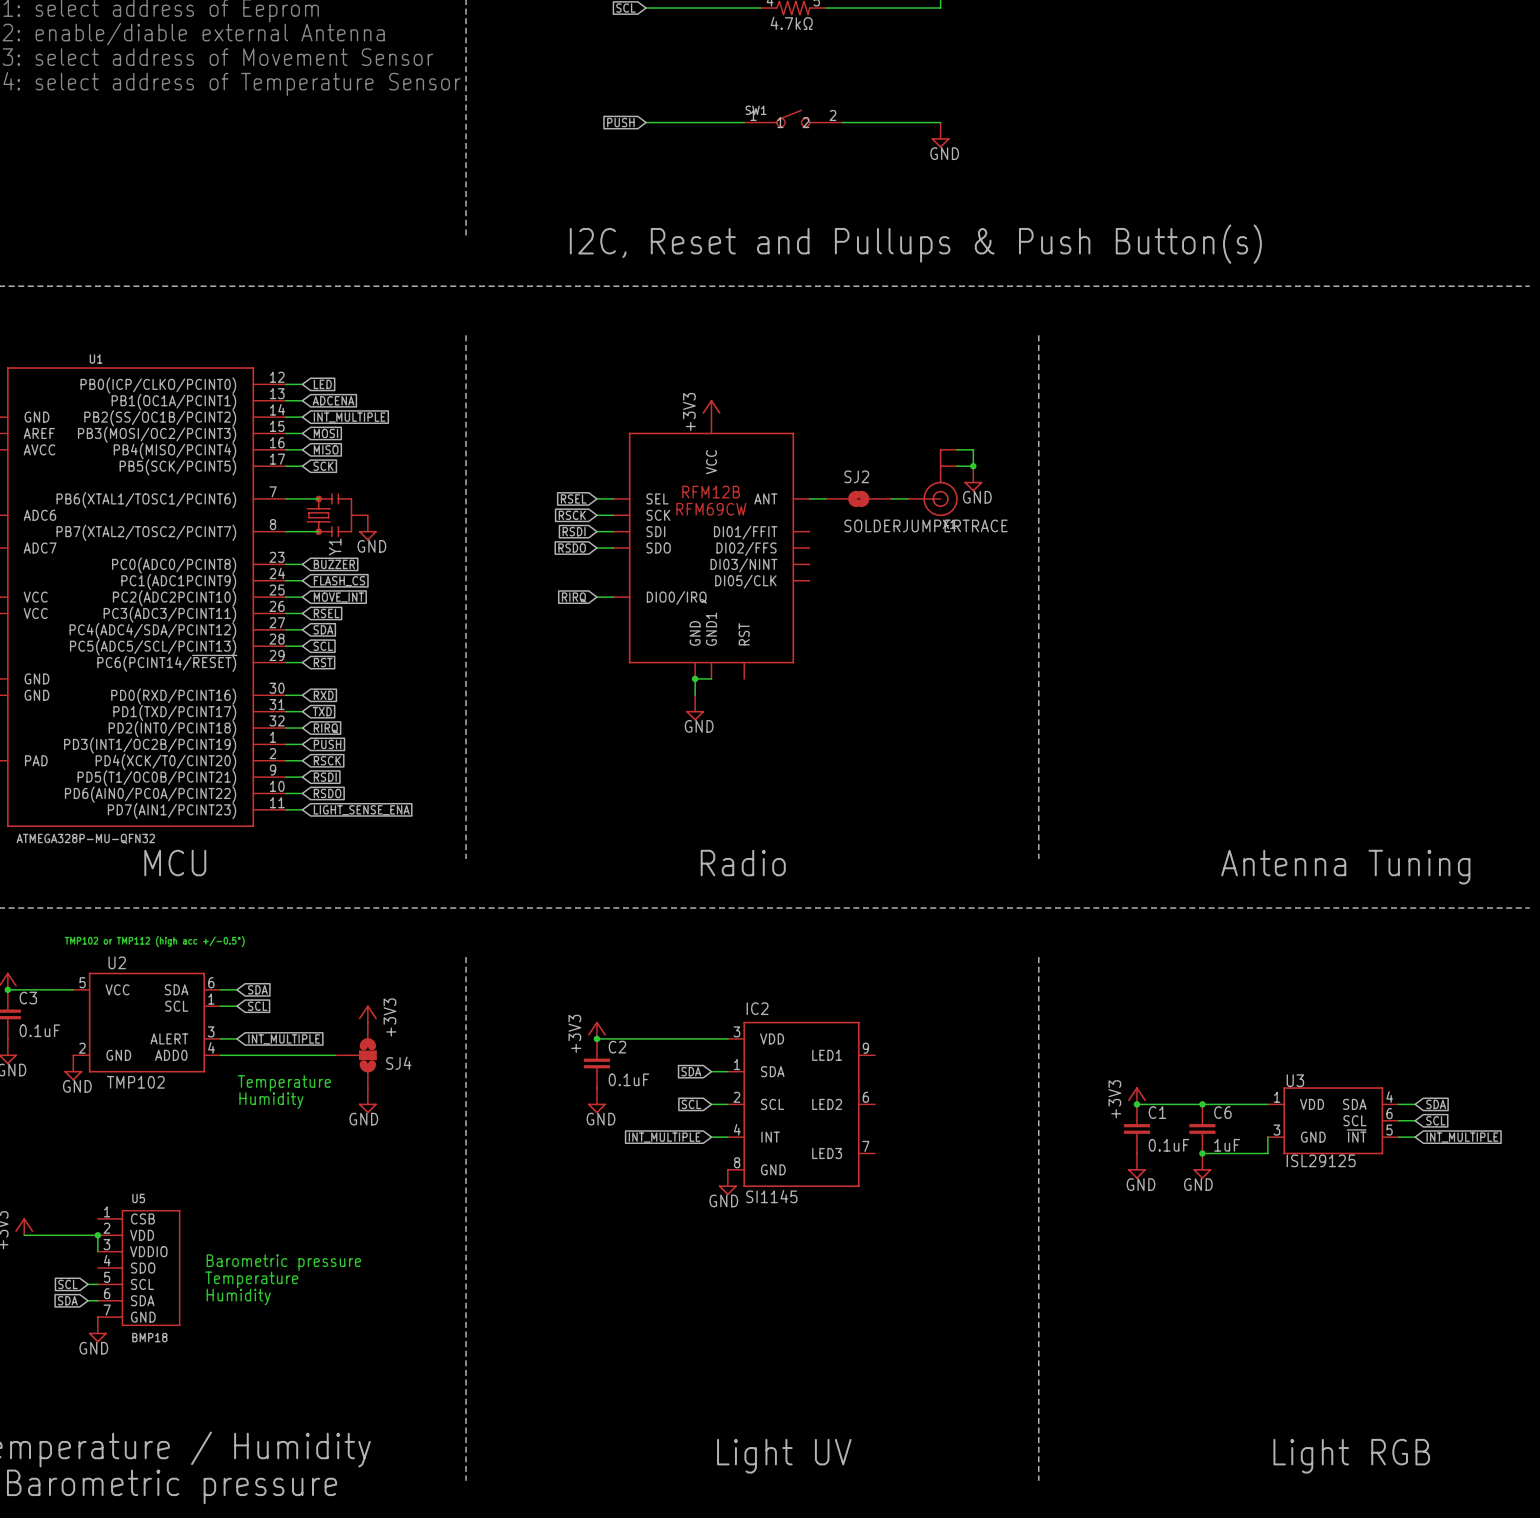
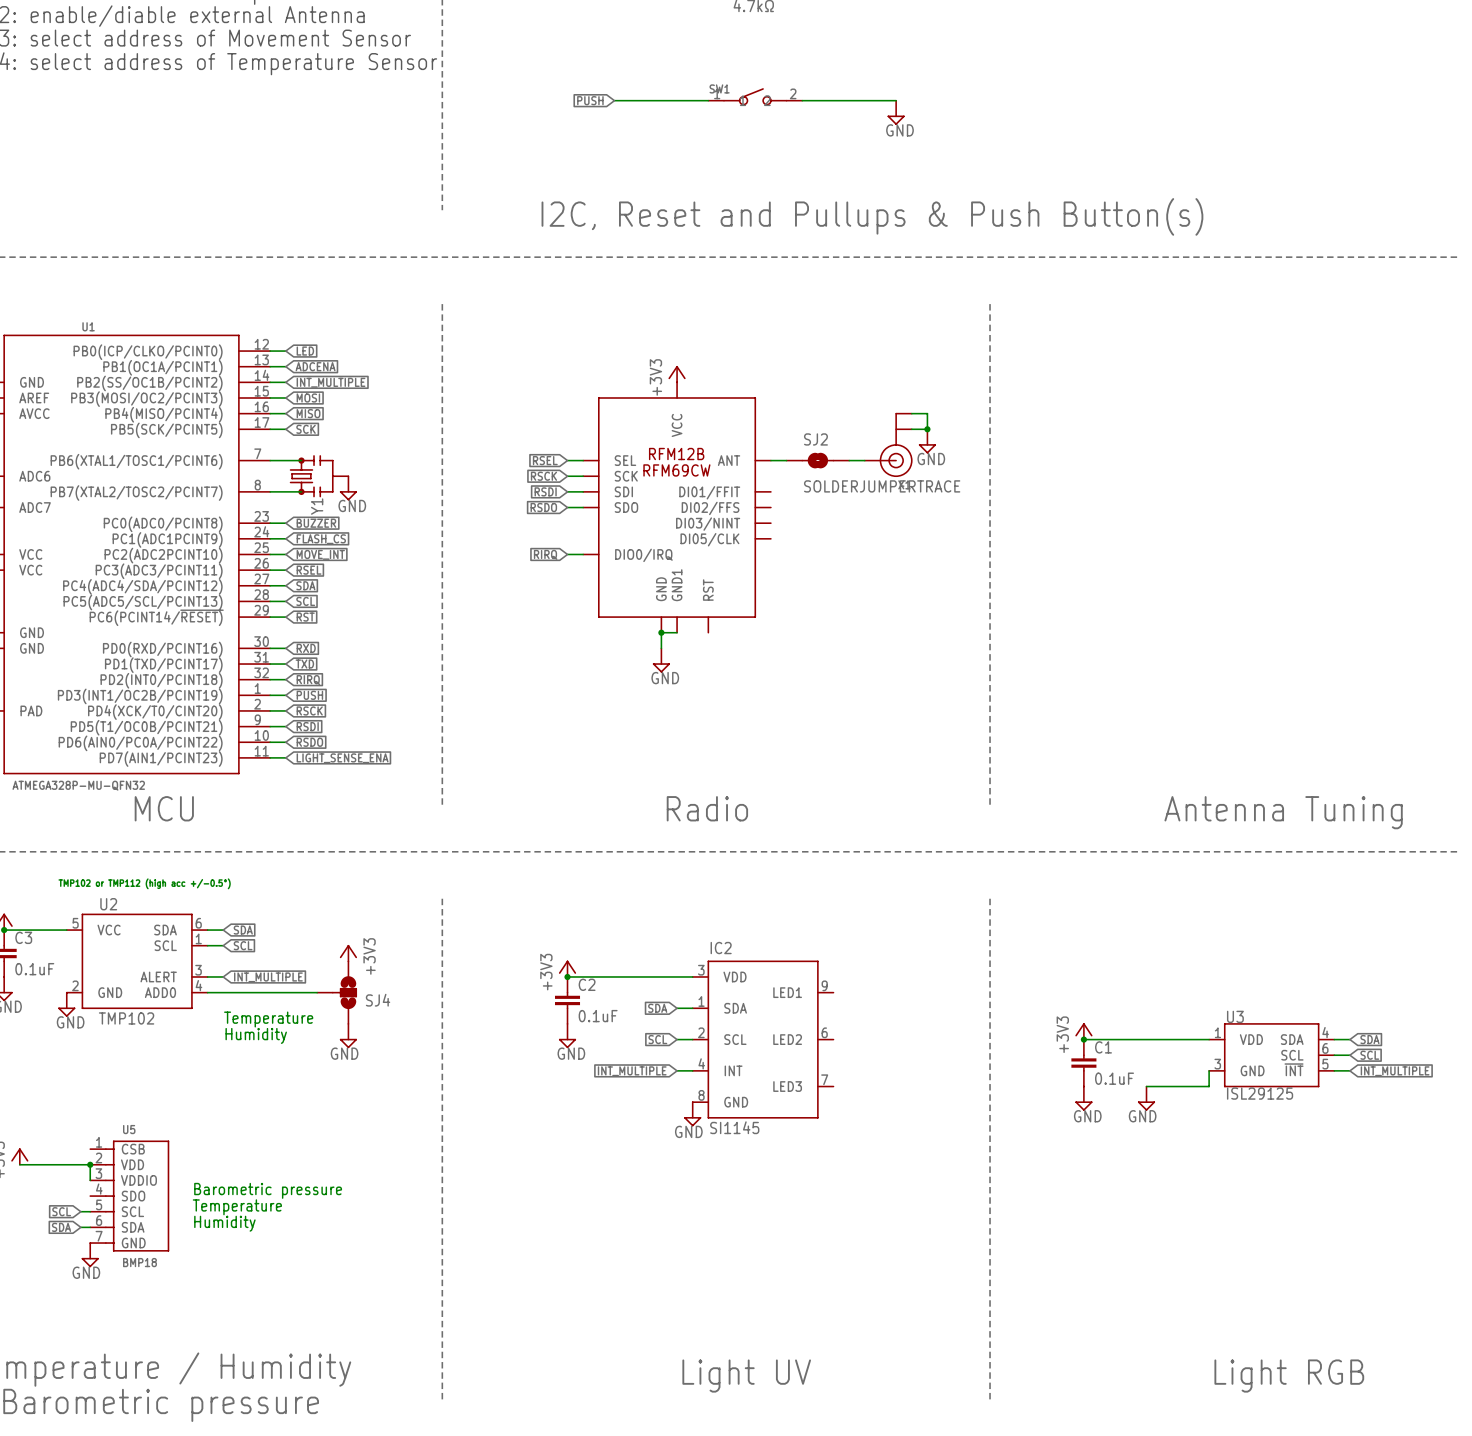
junction: (1202, 1104) -> none
C6: 1uF (1202, 1128) -> none
junction: (1202, 1153) -> none

